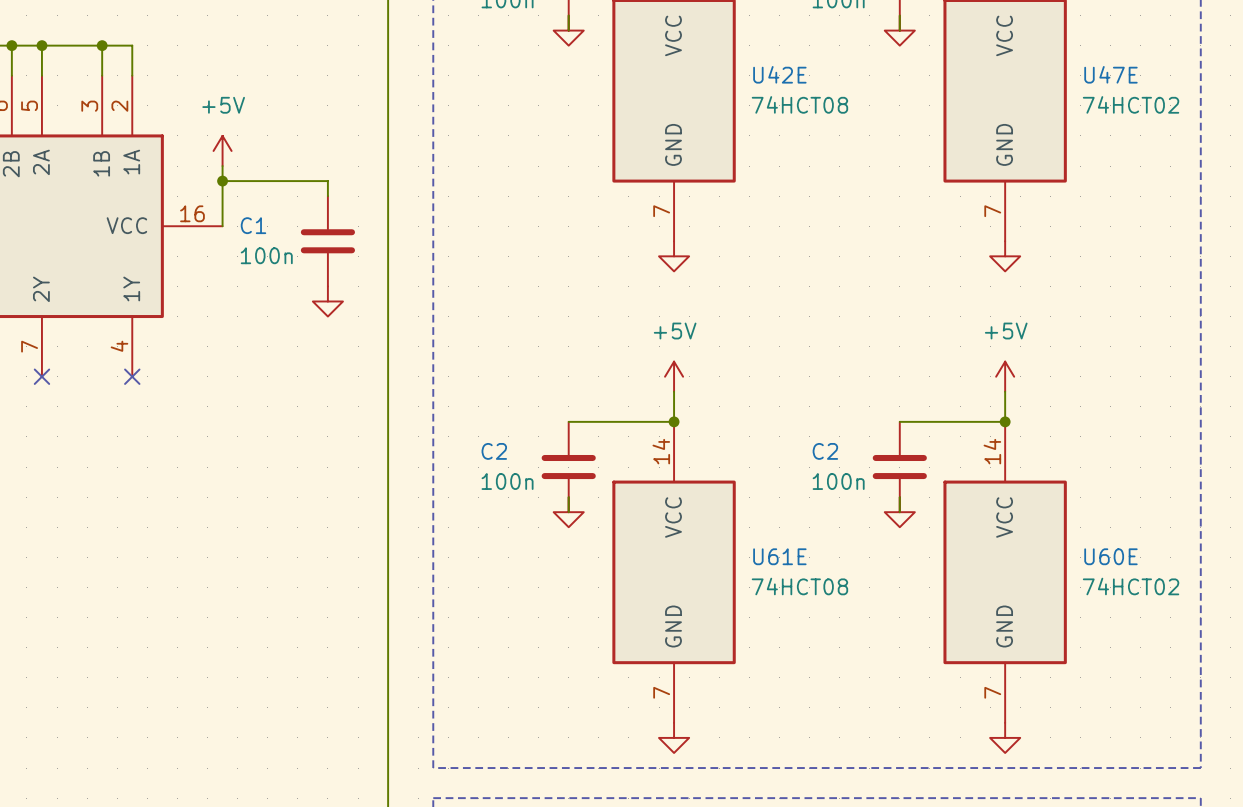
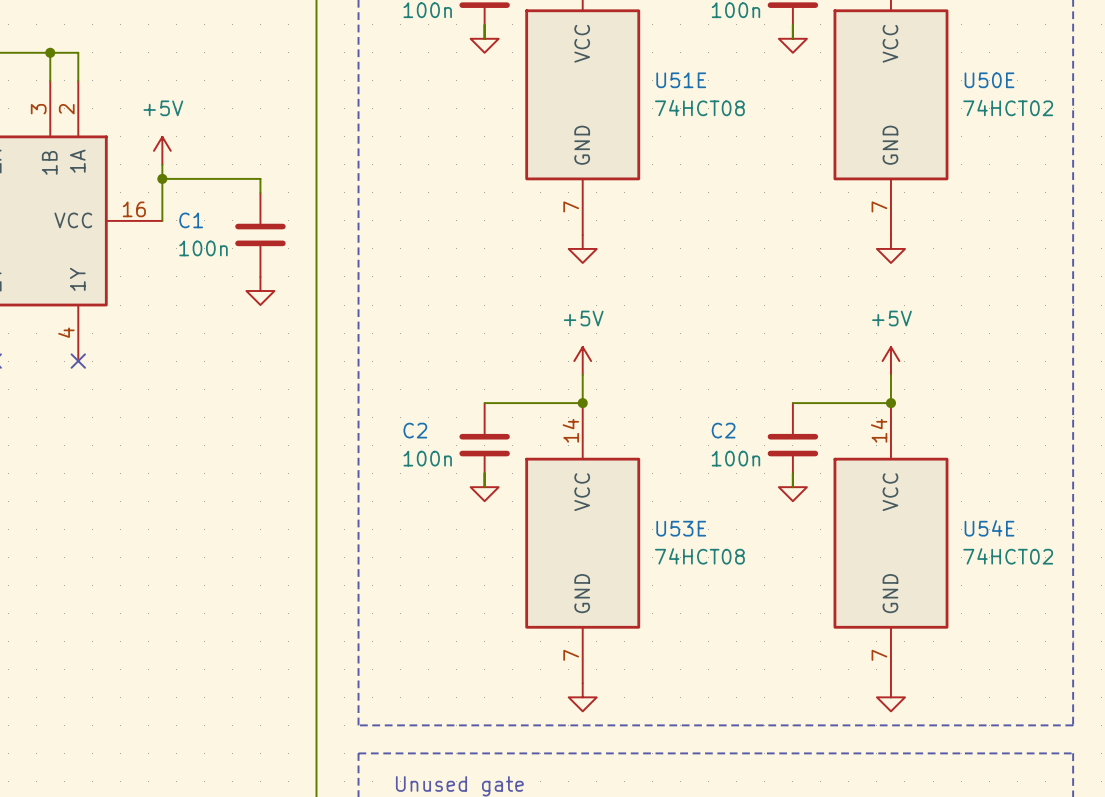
U42E name: U42E (779, 74) -> U51E (681, 80)
U47E name: U47E (1110, 74) -> U50E (989, 80)
U61E name: U61E (779, 556) -> U53E (681, 528)
U60E name: U60E (1110, 556) -> U54E (989, 528)

